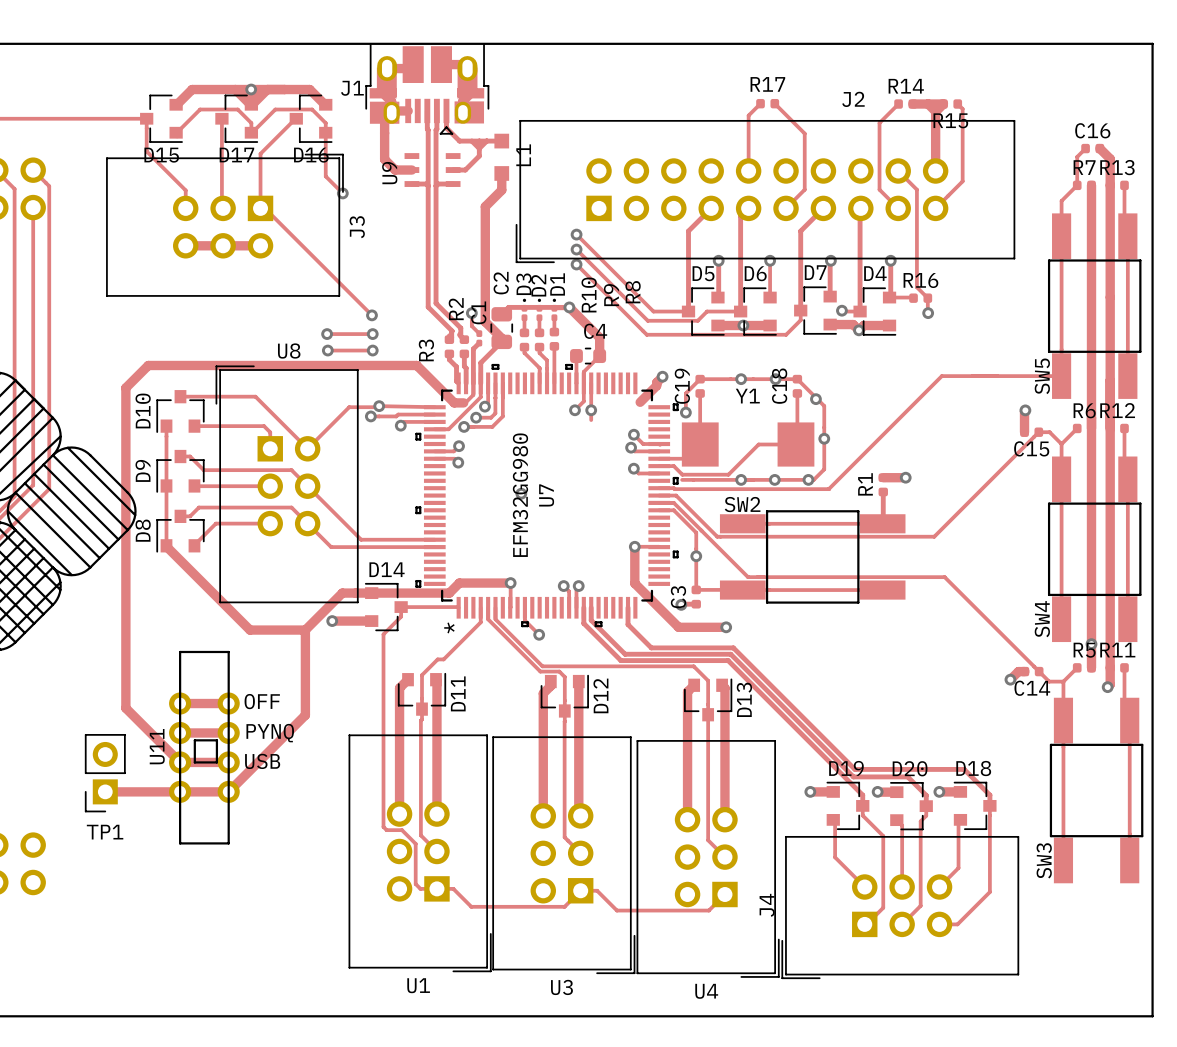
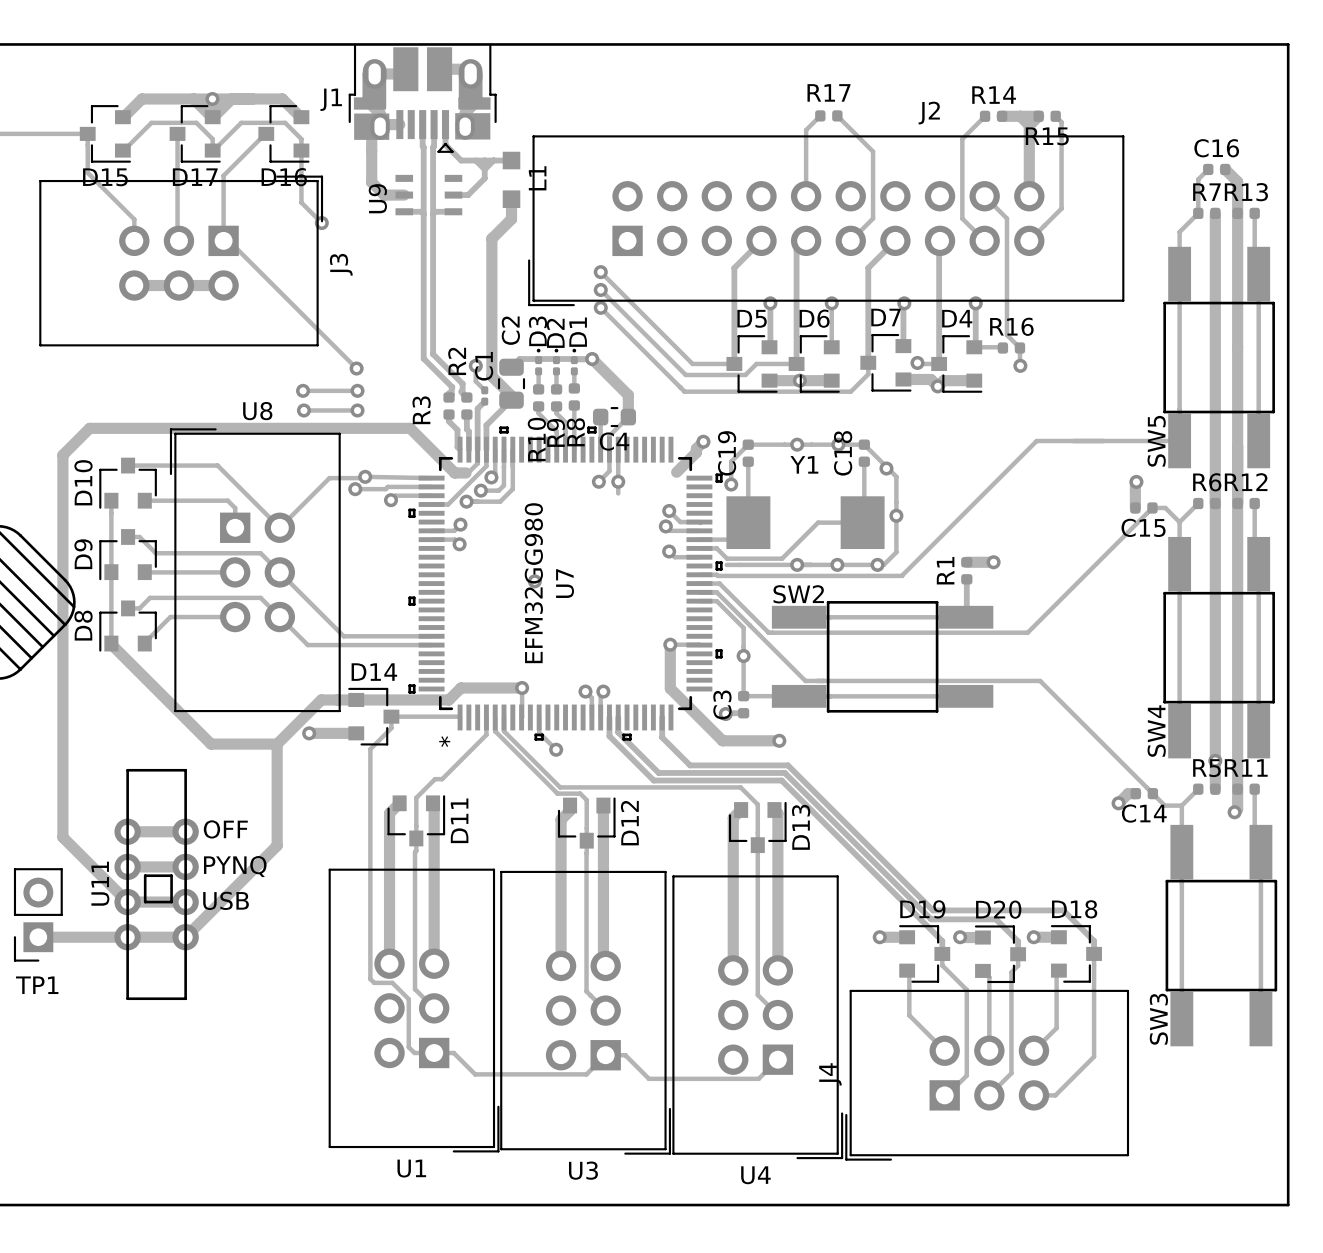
R8 name position: R8 (633, 292) -> R8 (575, 432)
R10 name position: R10 (589, 295) -> R10 (536, 439)
R9 name position: R9 (611, 295) -> R9 (555, 432)
C4 name position: C4 (595, 331) -> C4 (614, 441)

